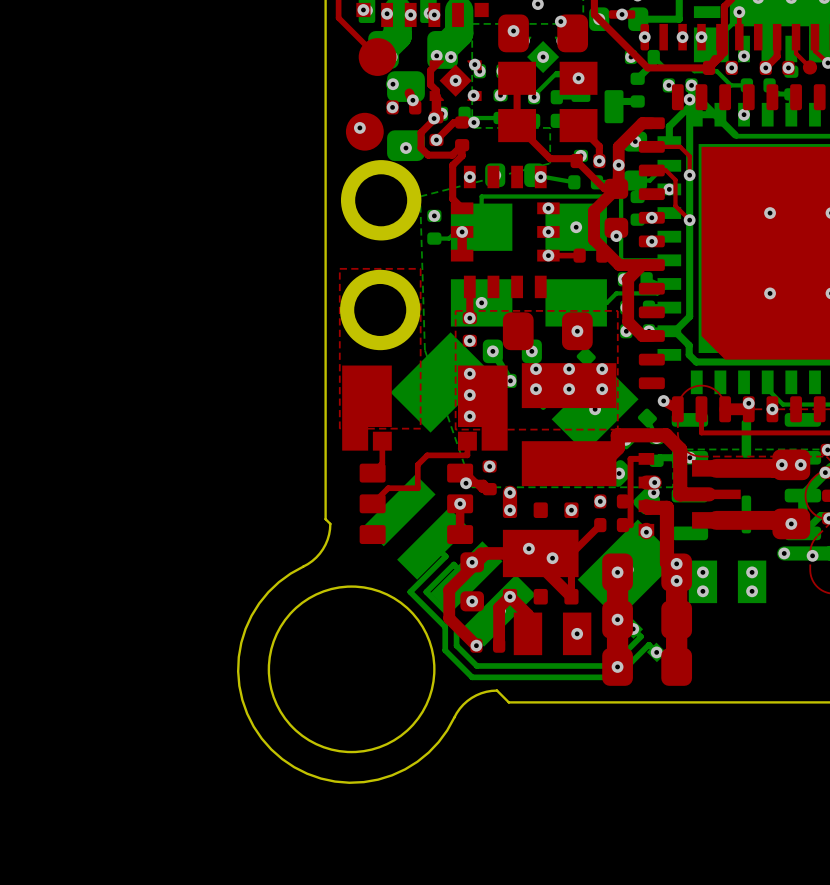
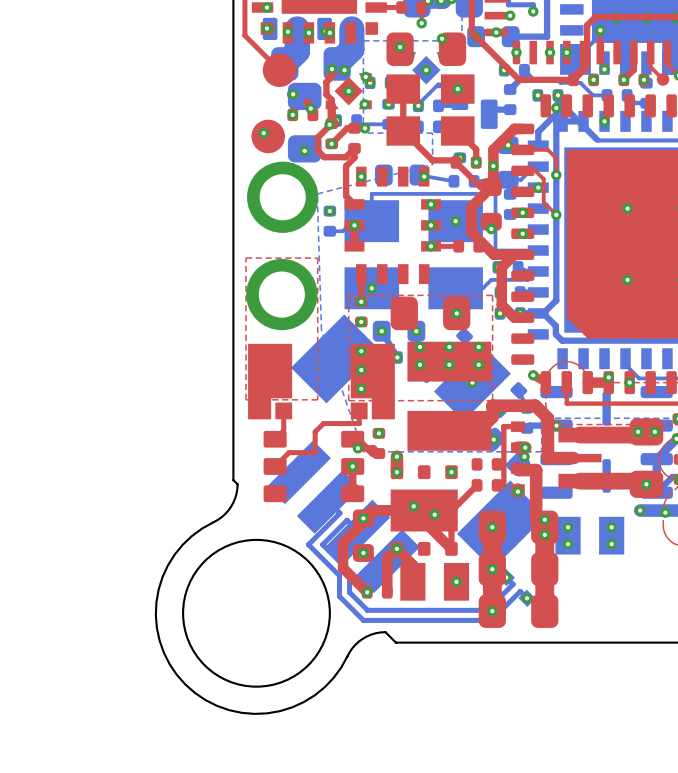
via: (600, 501) -> none

